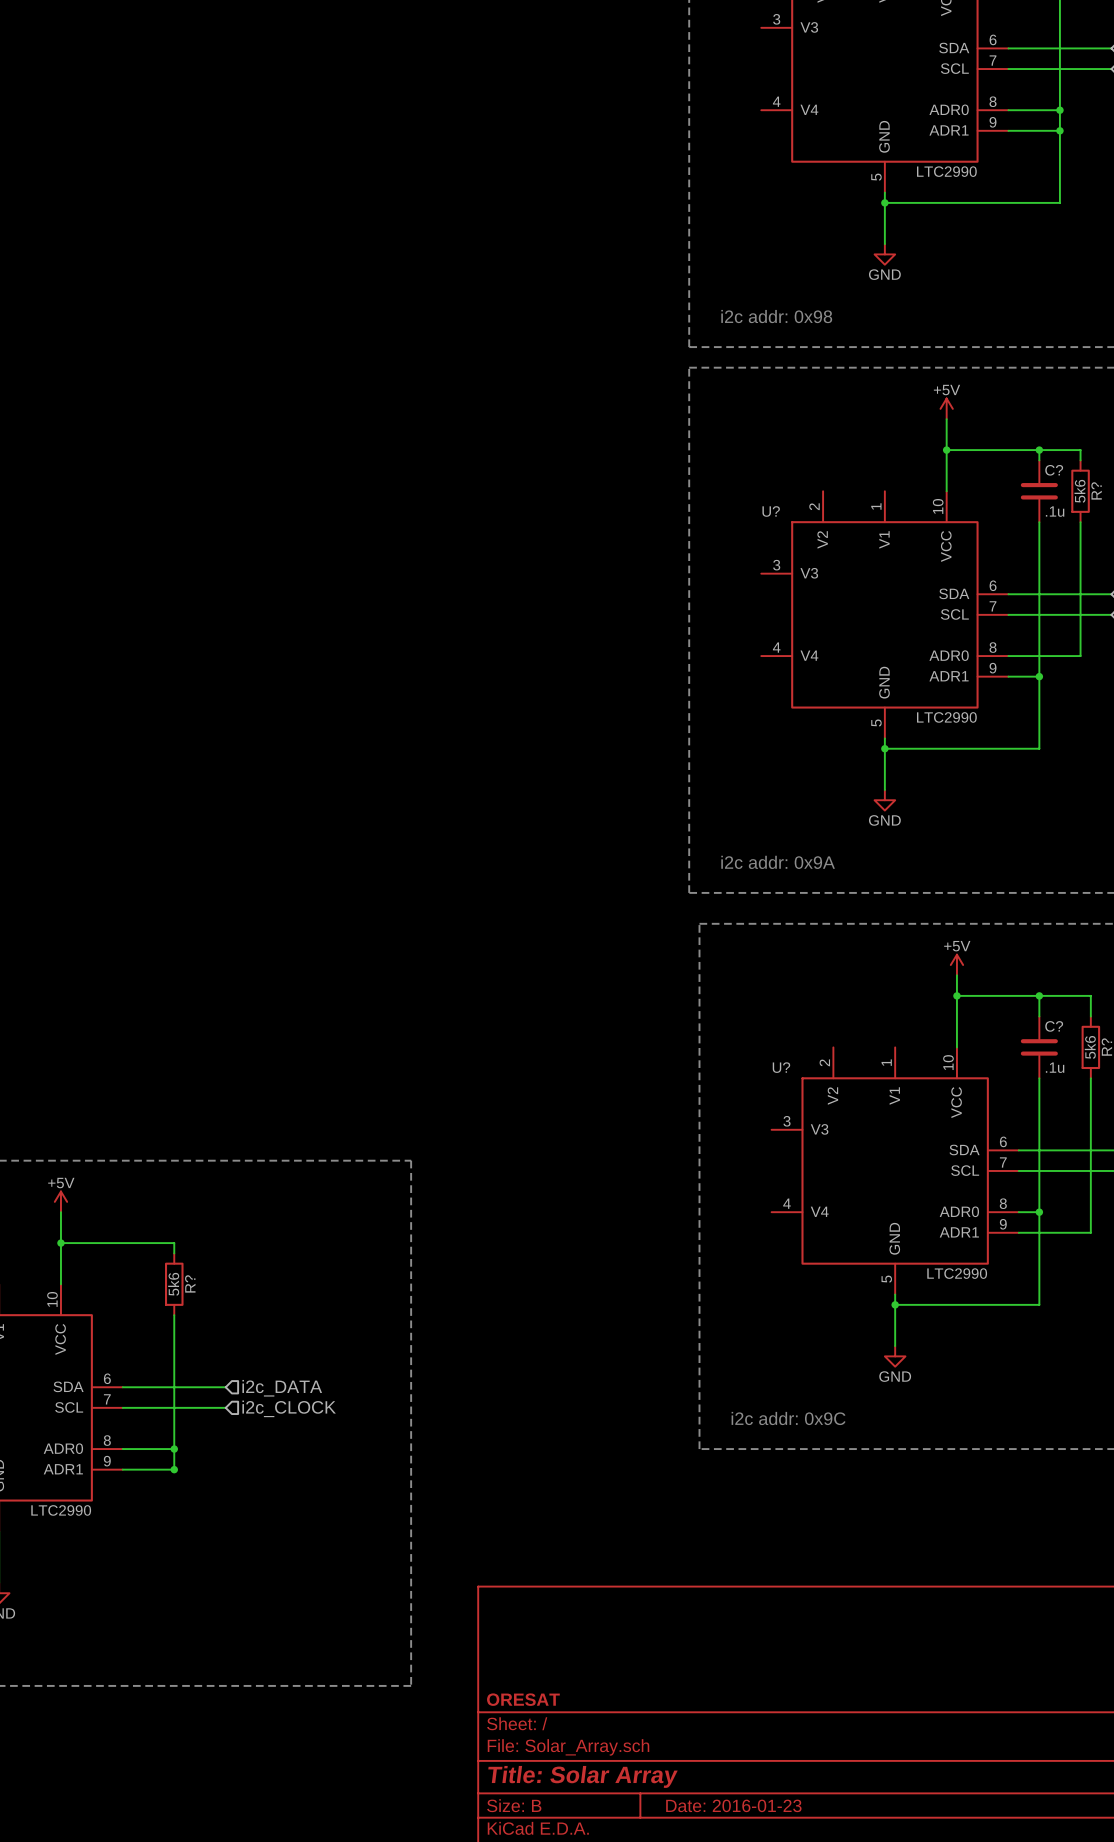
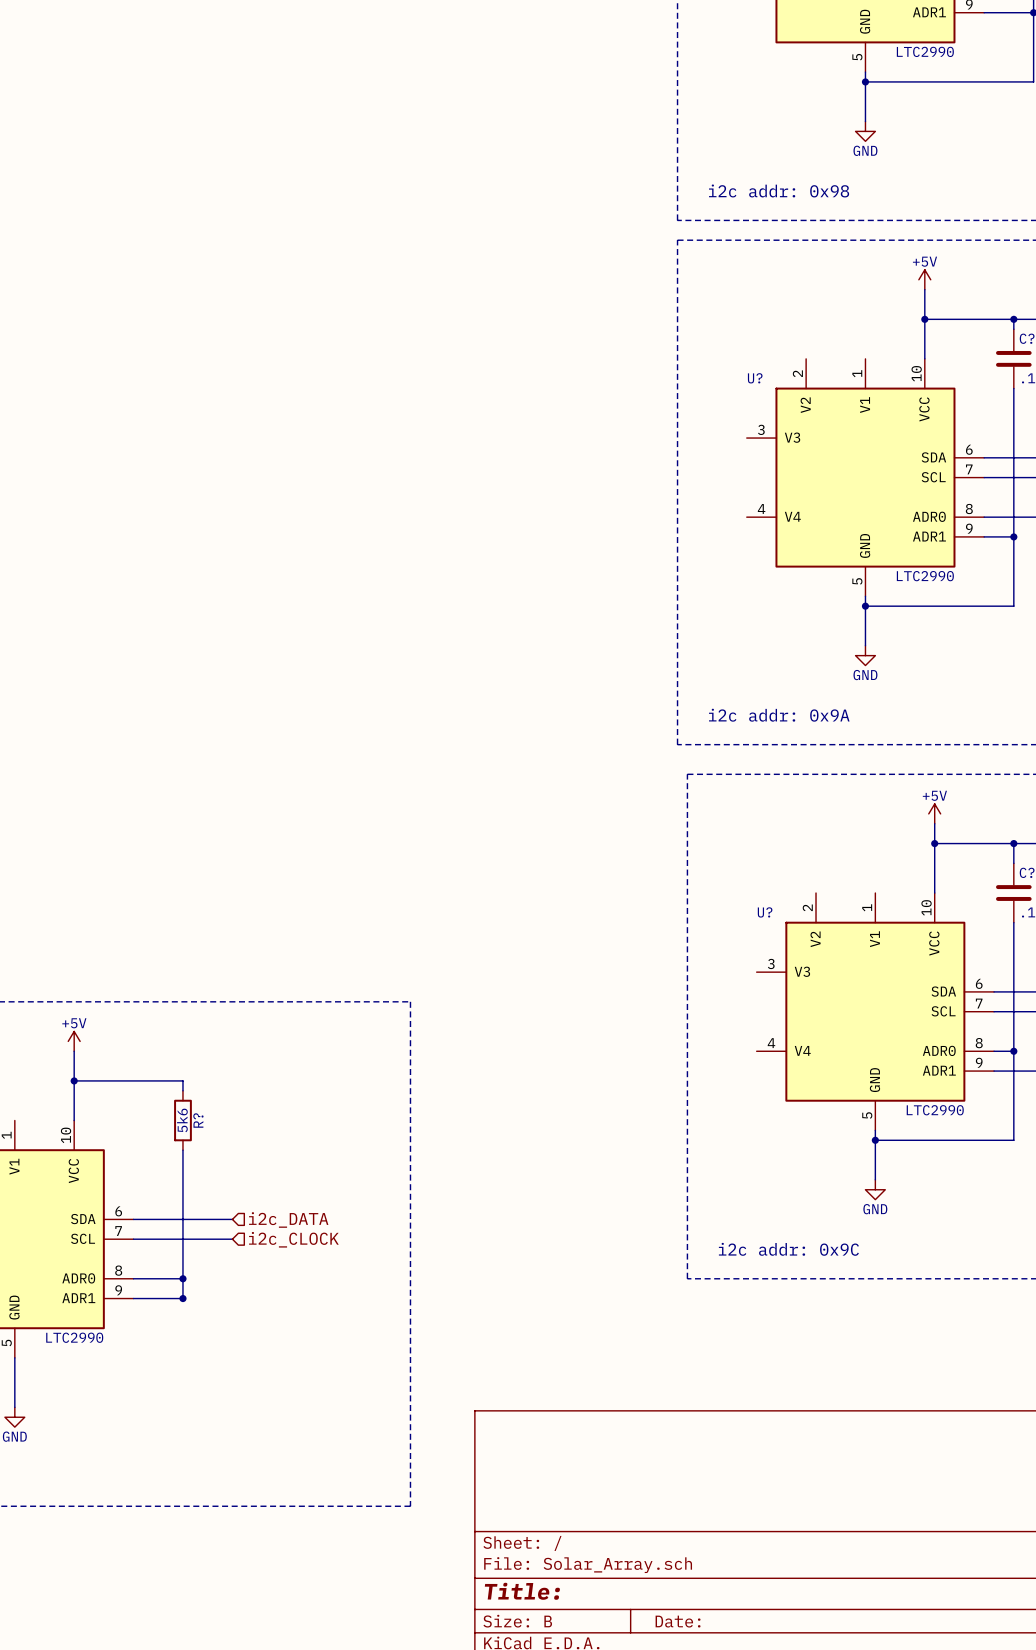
title block: ORESAT (523, 1699) -> none
title block: Title: Solar Array (582, 1776) -> Title: (522, 1591)
title block: Date: 2016-01-23 (733, 1805) -> Date: (678, 1621)

